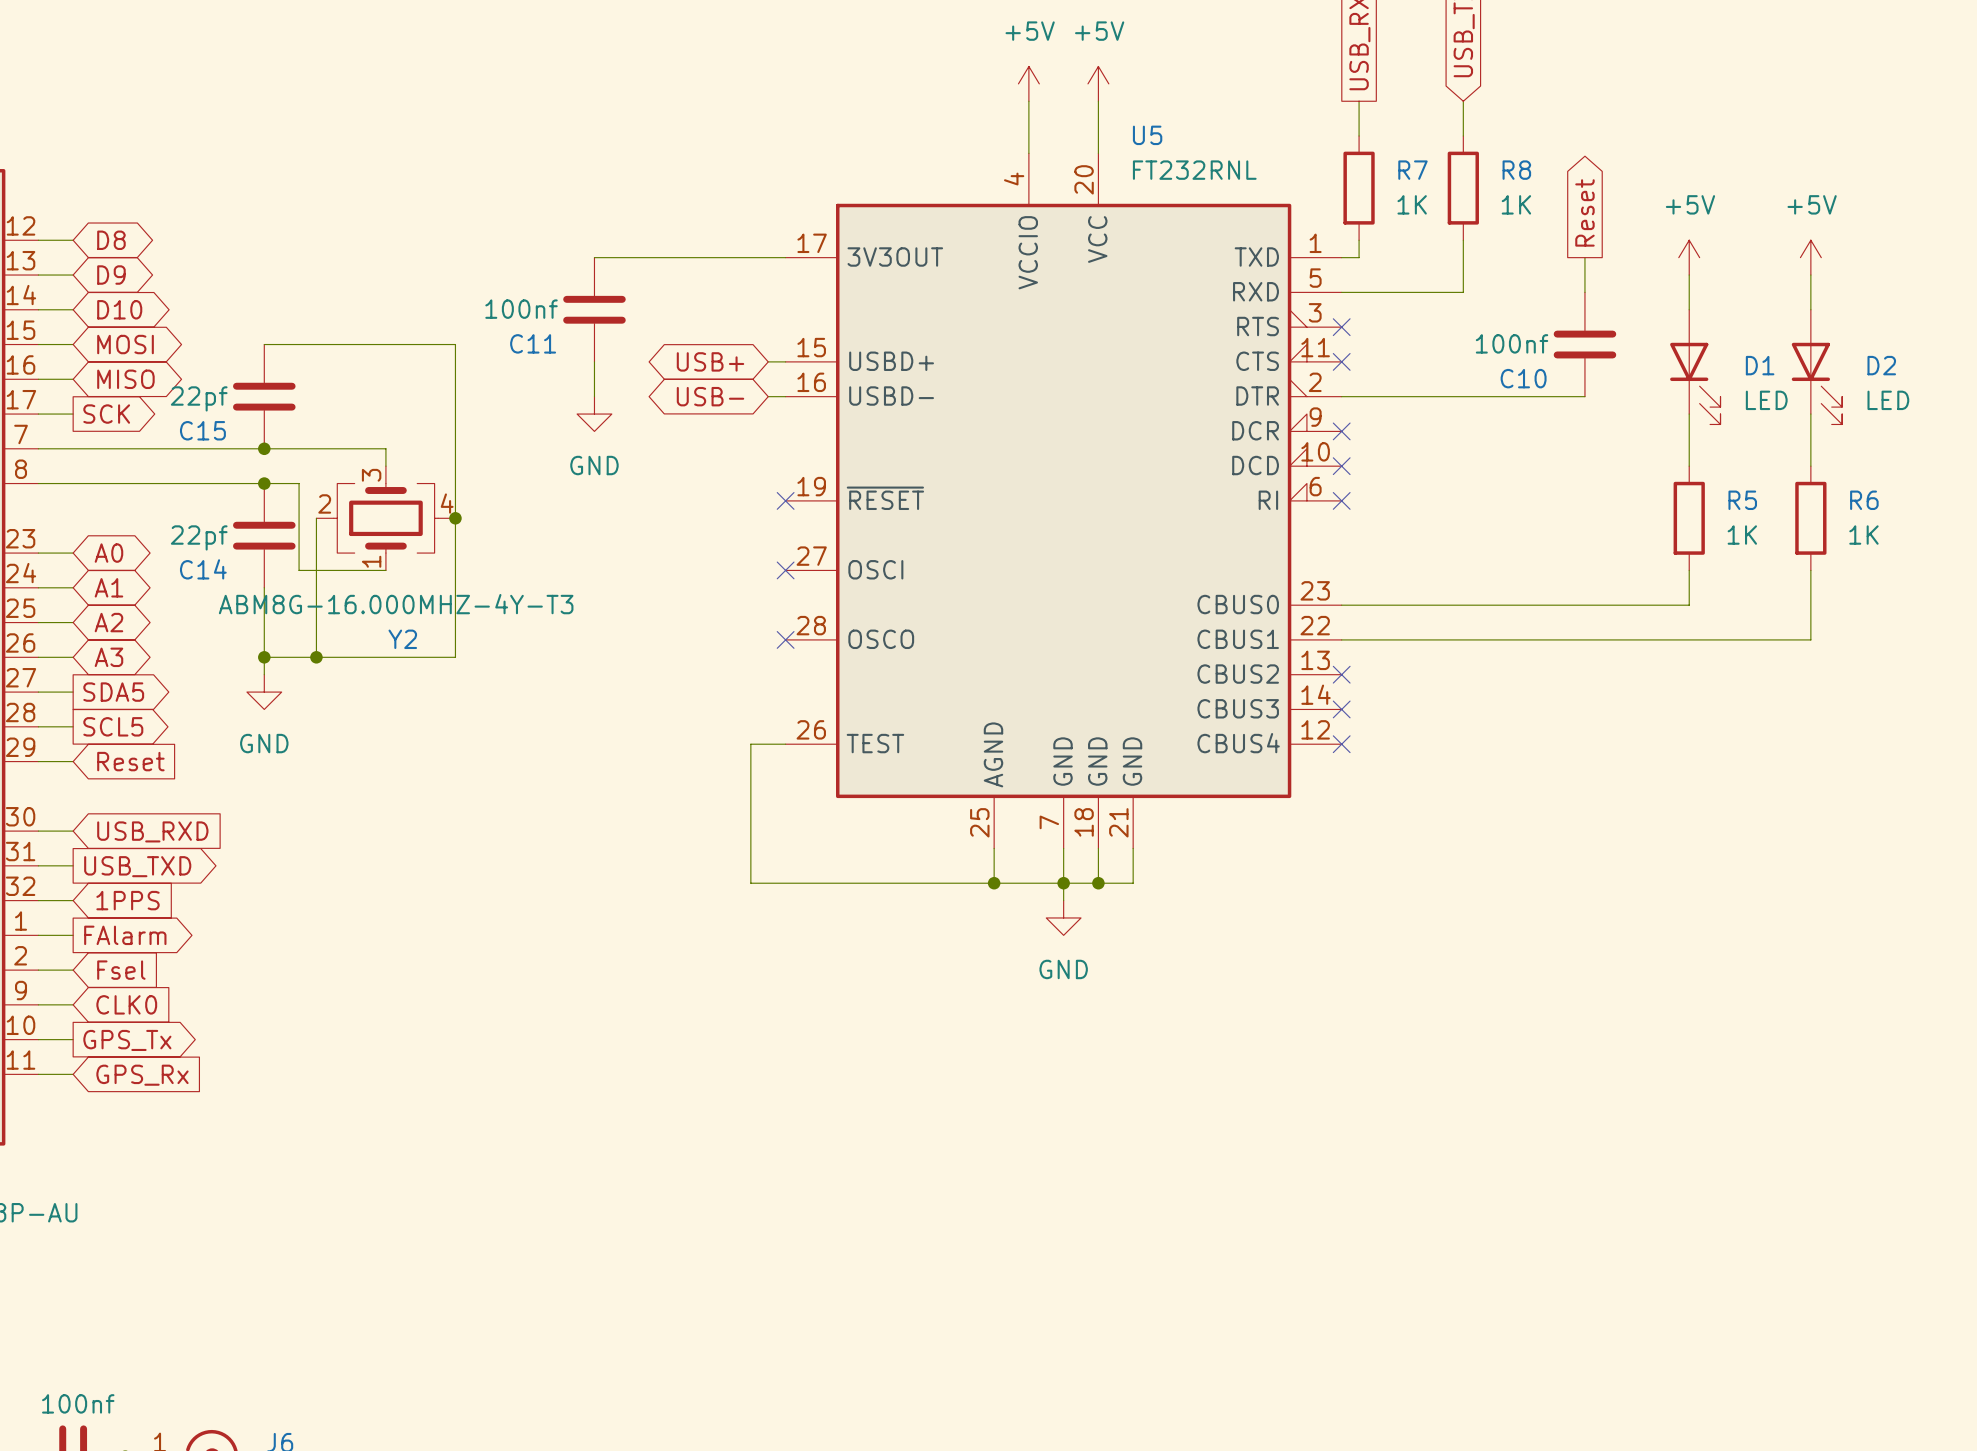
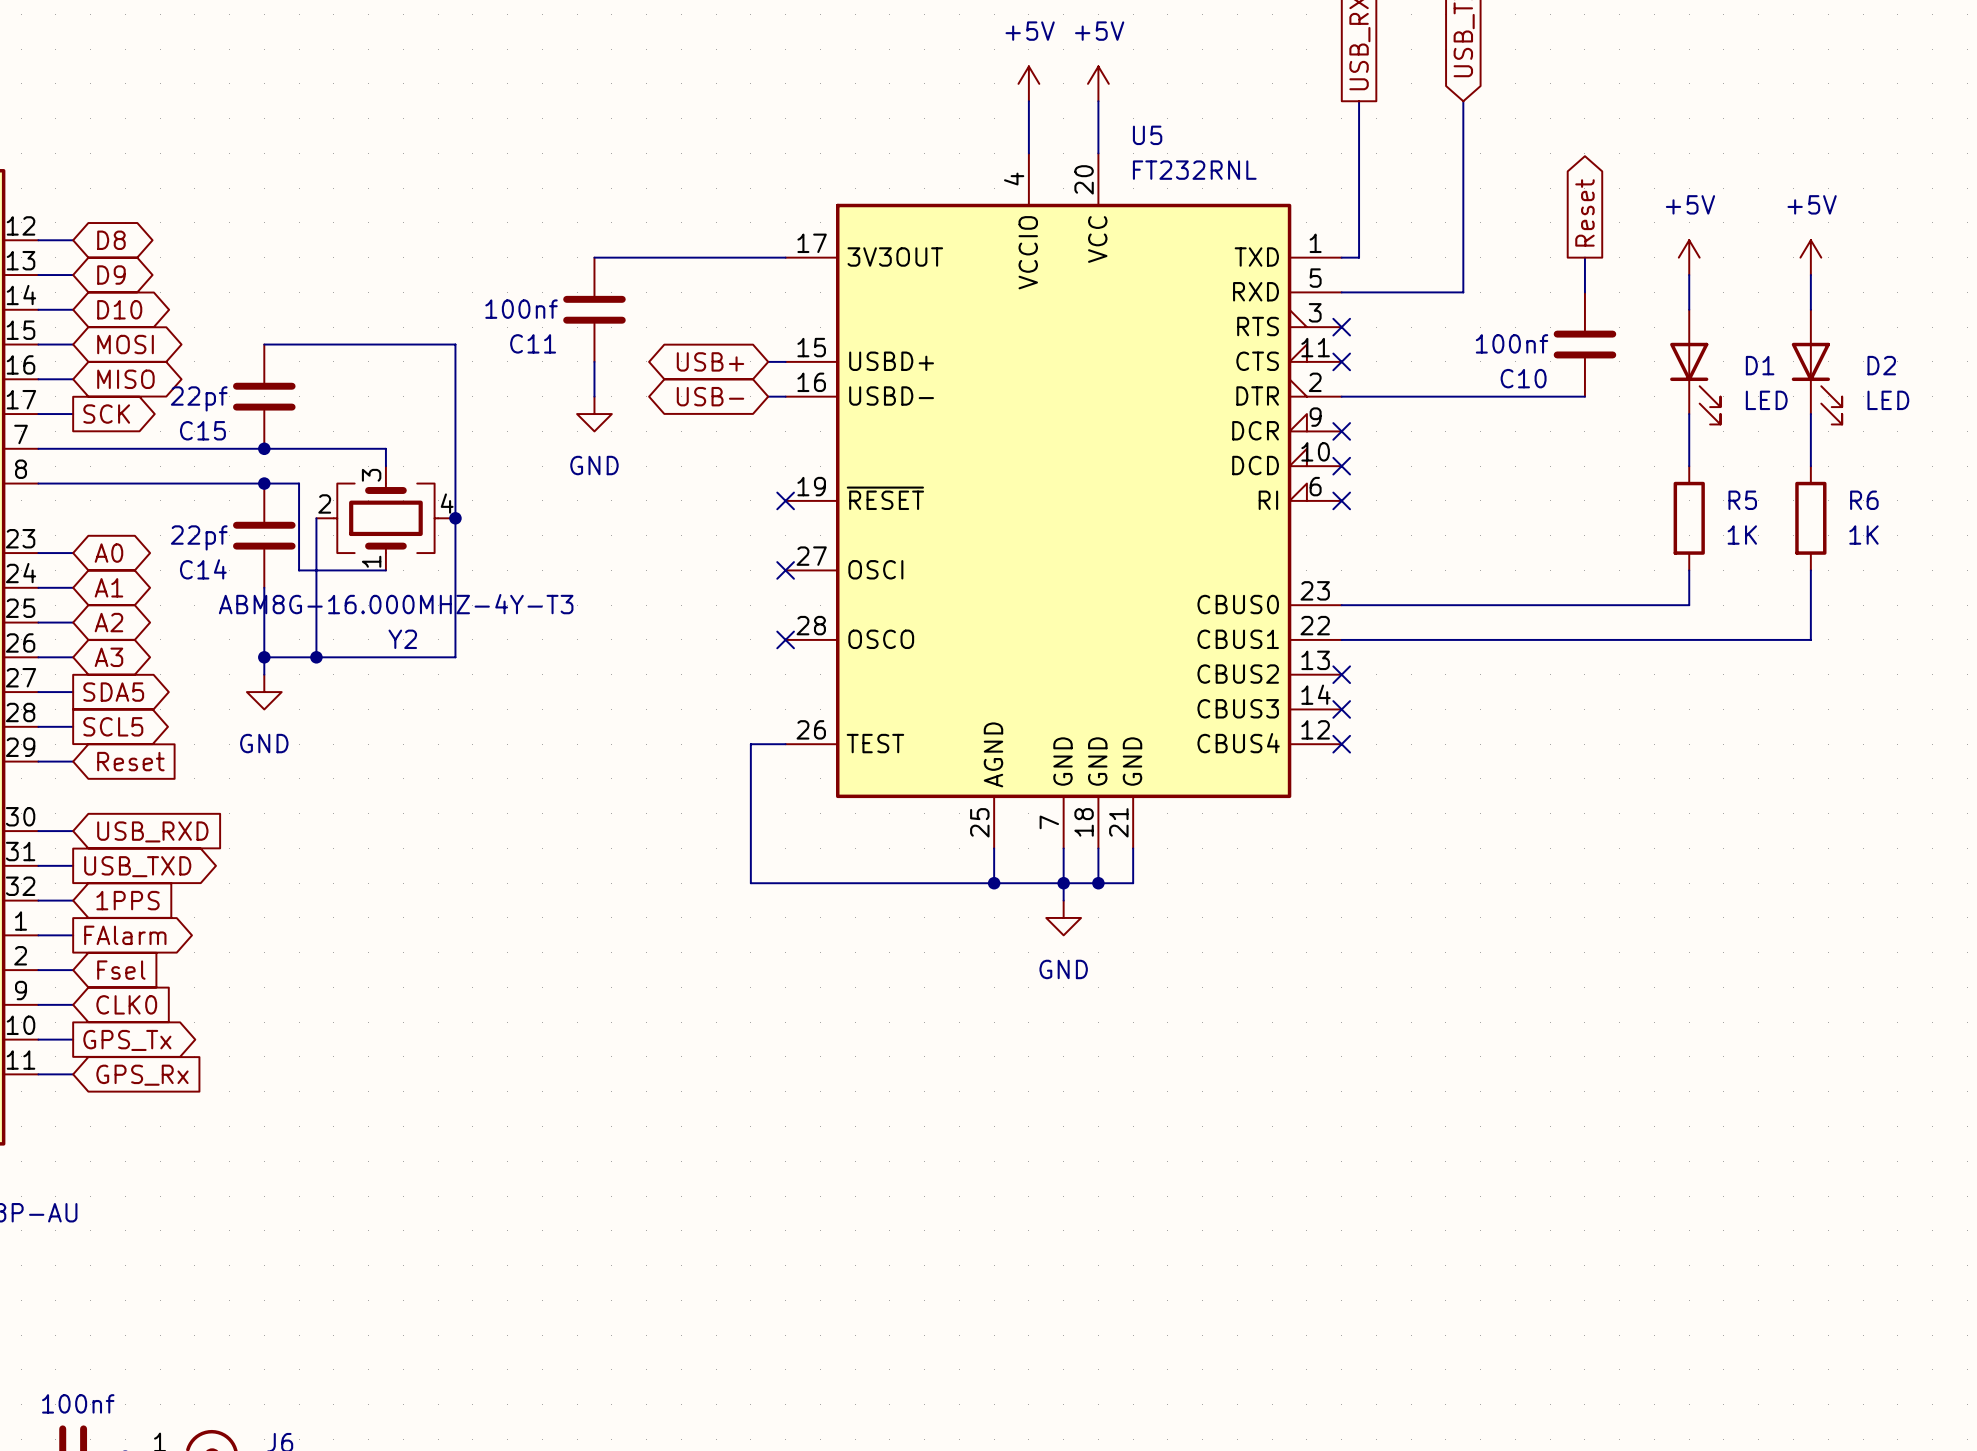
wire: none -> (1359, 136) (1359, 240)
wire: none -> (1463, 136) (1463, 240)
R7: 1K (1359, 188) -> none
R8: 1K (1463, 188) -> none

